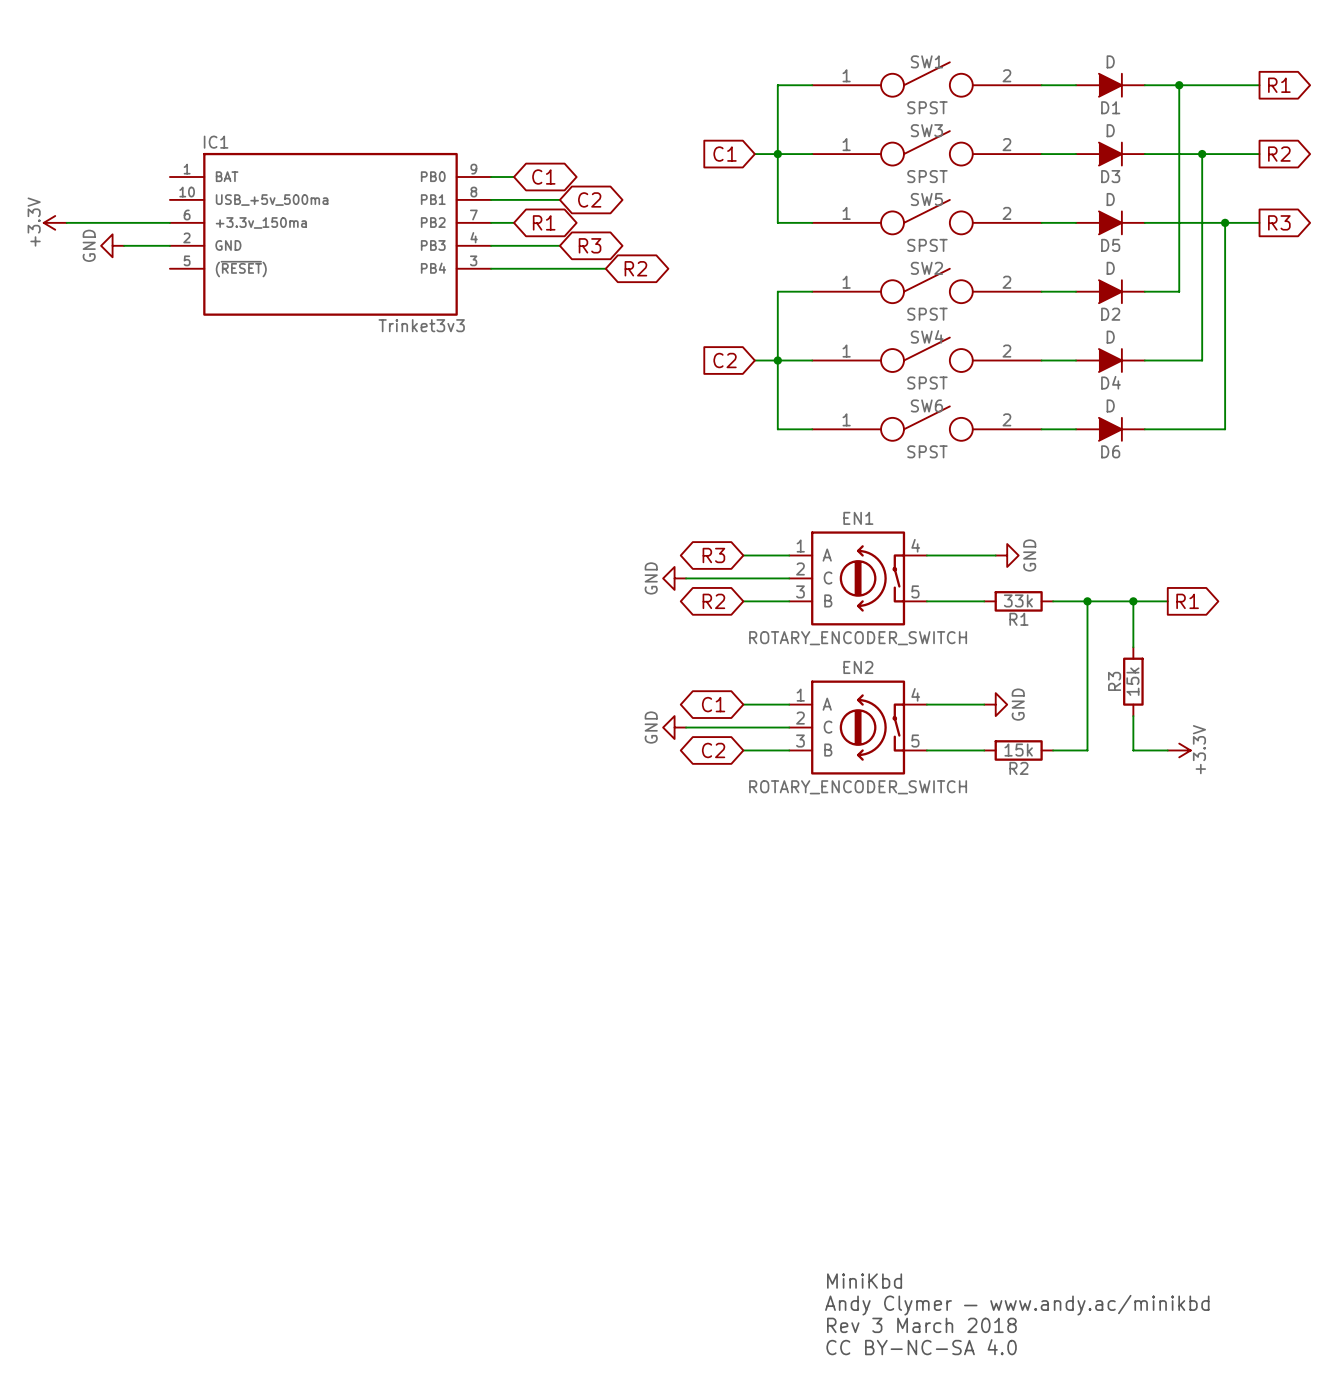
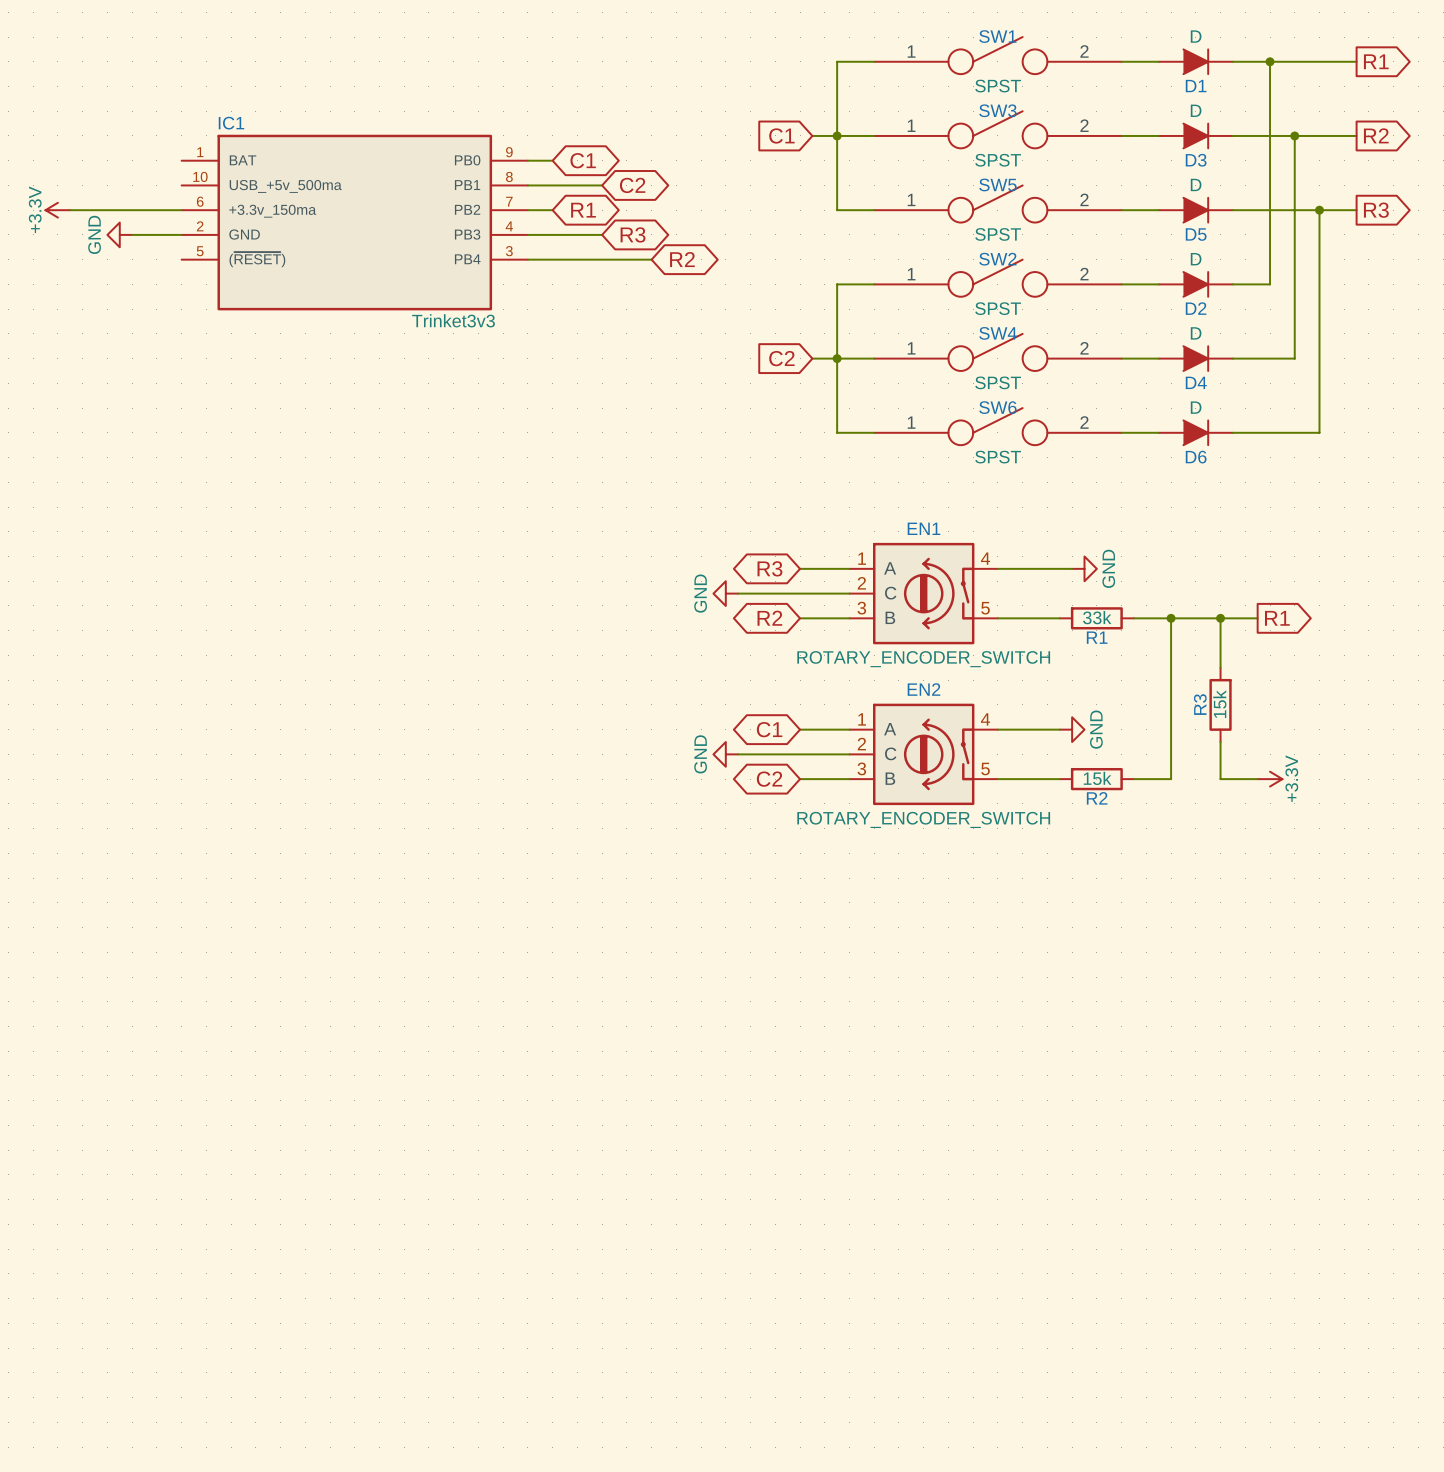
text: MiniKbd (864, 1281) -> none
text: Andy Clymer — www.andy.ac/minikbd (1017, 1305) -> none
text: Rev 3 March 2018 (921, 1325) -> none
text: CC BY-NC-SA 4.0 (921, 1347) -> none

